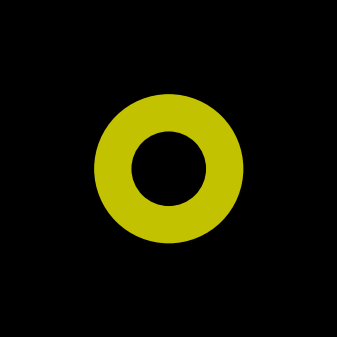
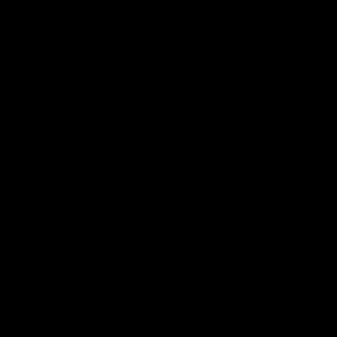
part: (168, 168) -> none

